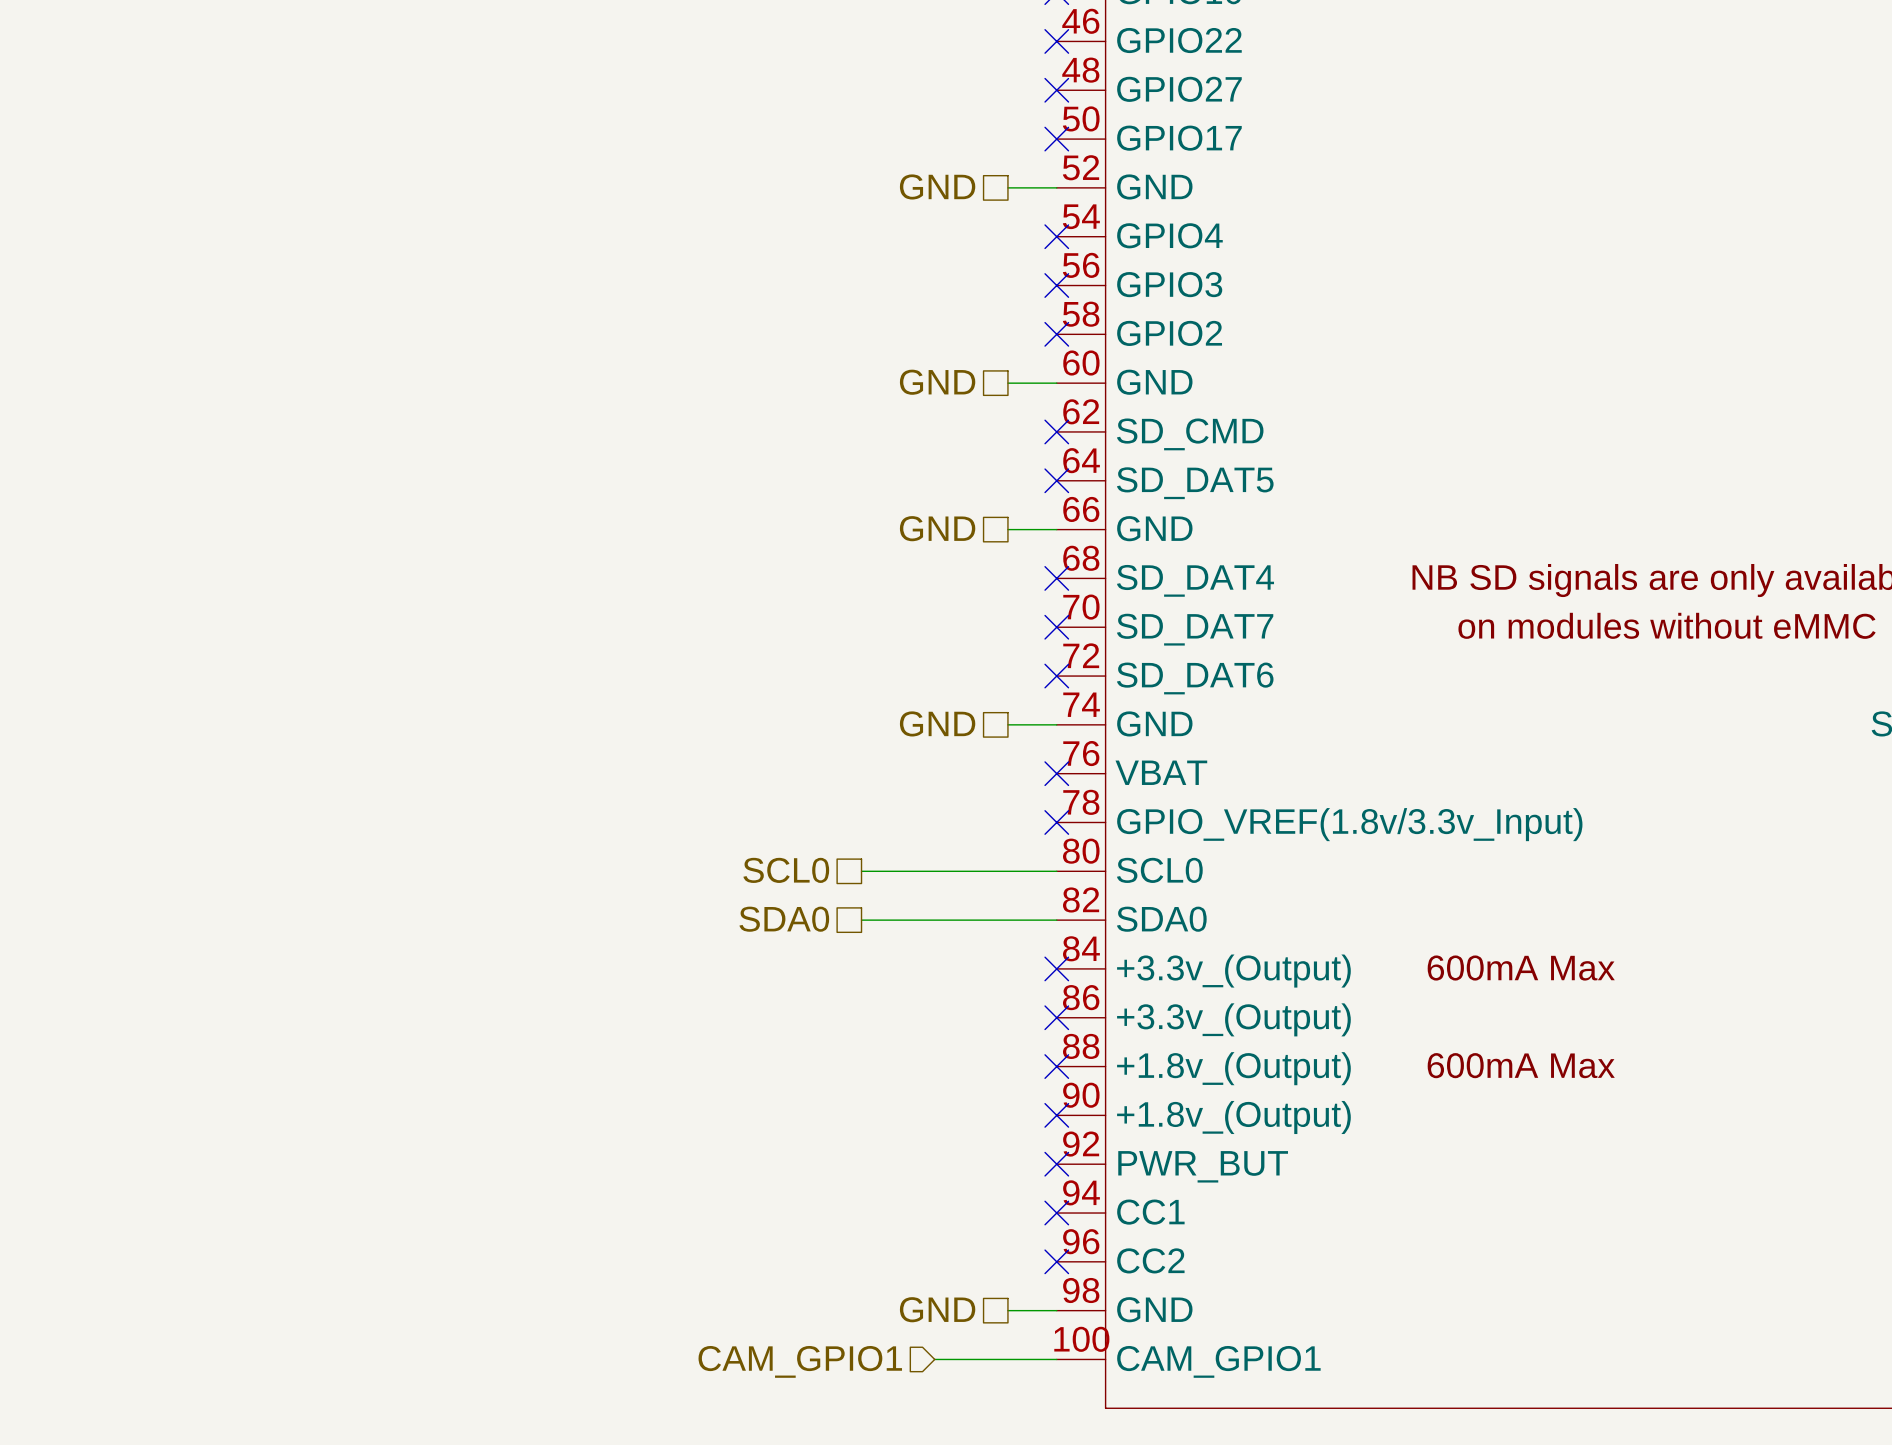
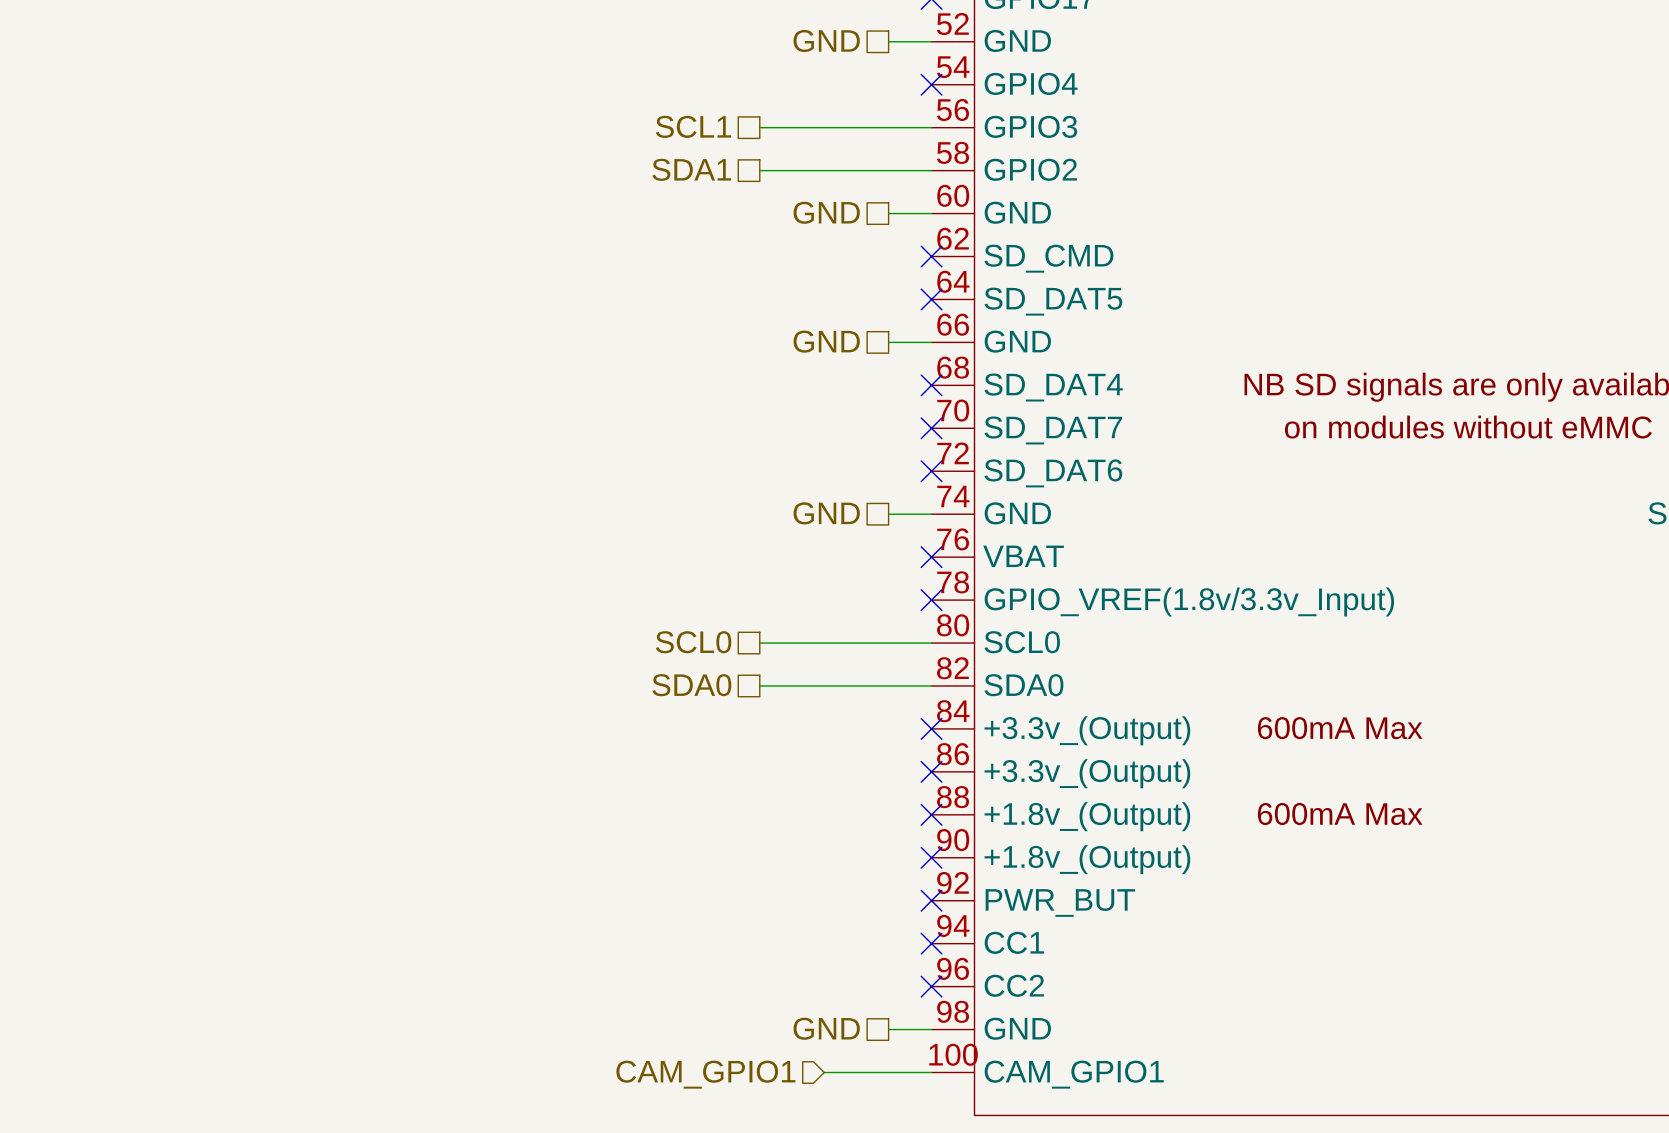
hierarchical label: none -> SCL1 (693, 126)
wire: none -> (759, 127) (931, 127)
no-connect mark: (1056, 285) -> none
hierarchical label: none -> SDA1 (691, 169)
wire: none -> (759, 170) (931, 170)
no-connect mark: (1056, 334) -> none

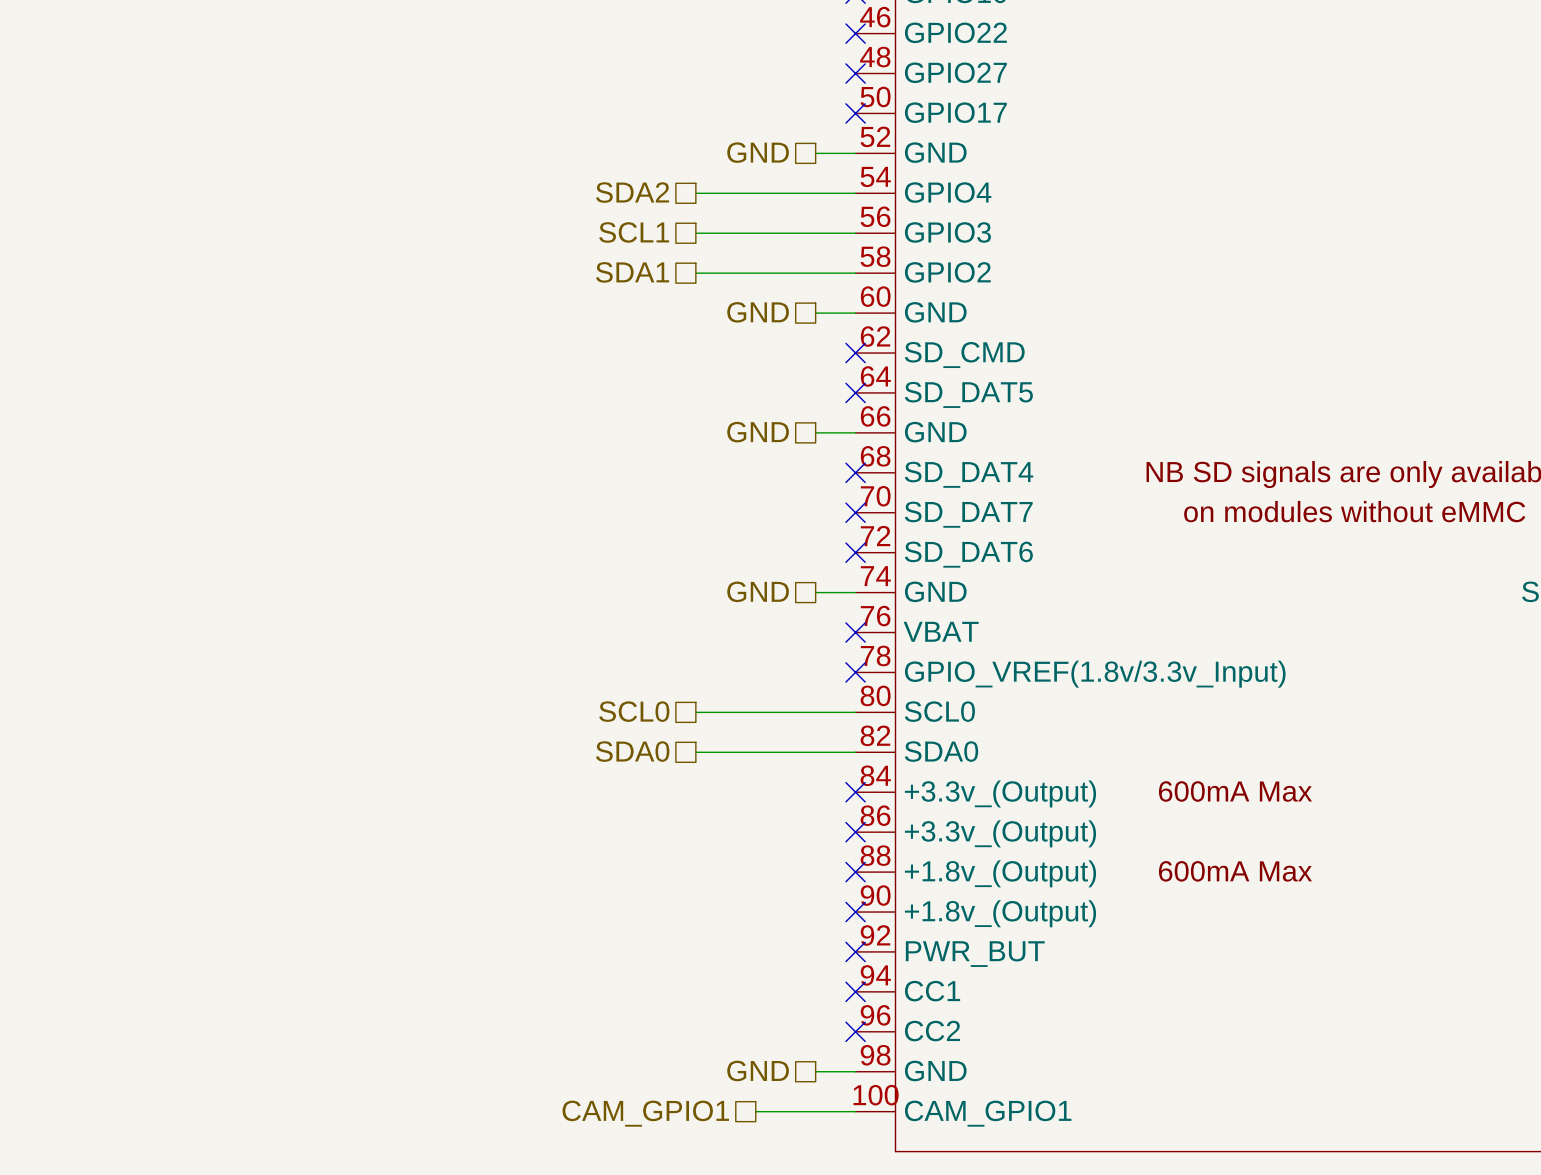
hierarchical label: none -> SDA2 (632, 192)
wire: none -> (695, 193) (855, 193)
no-connect mark: (931, 84) -> none
hierarchical label shape: input (705, 1074) -> passive (645, 1113)

